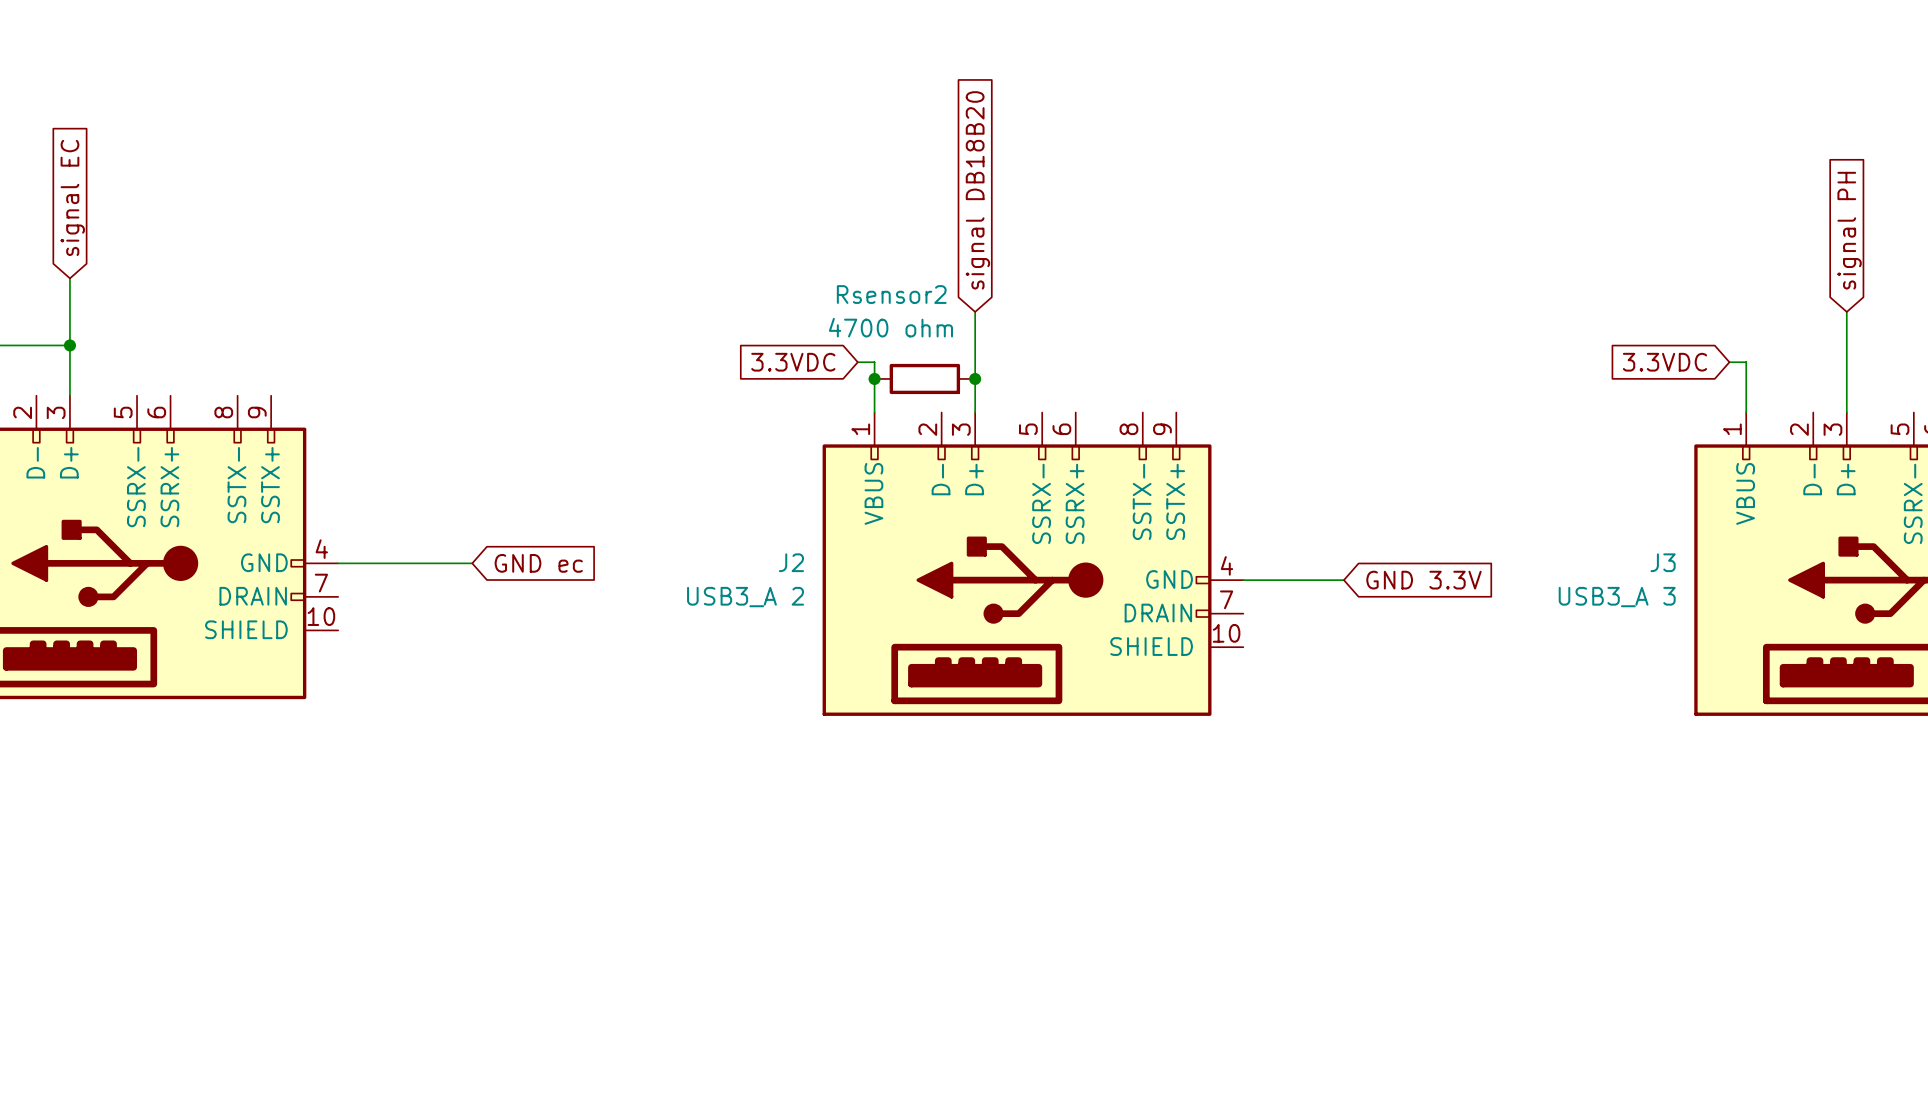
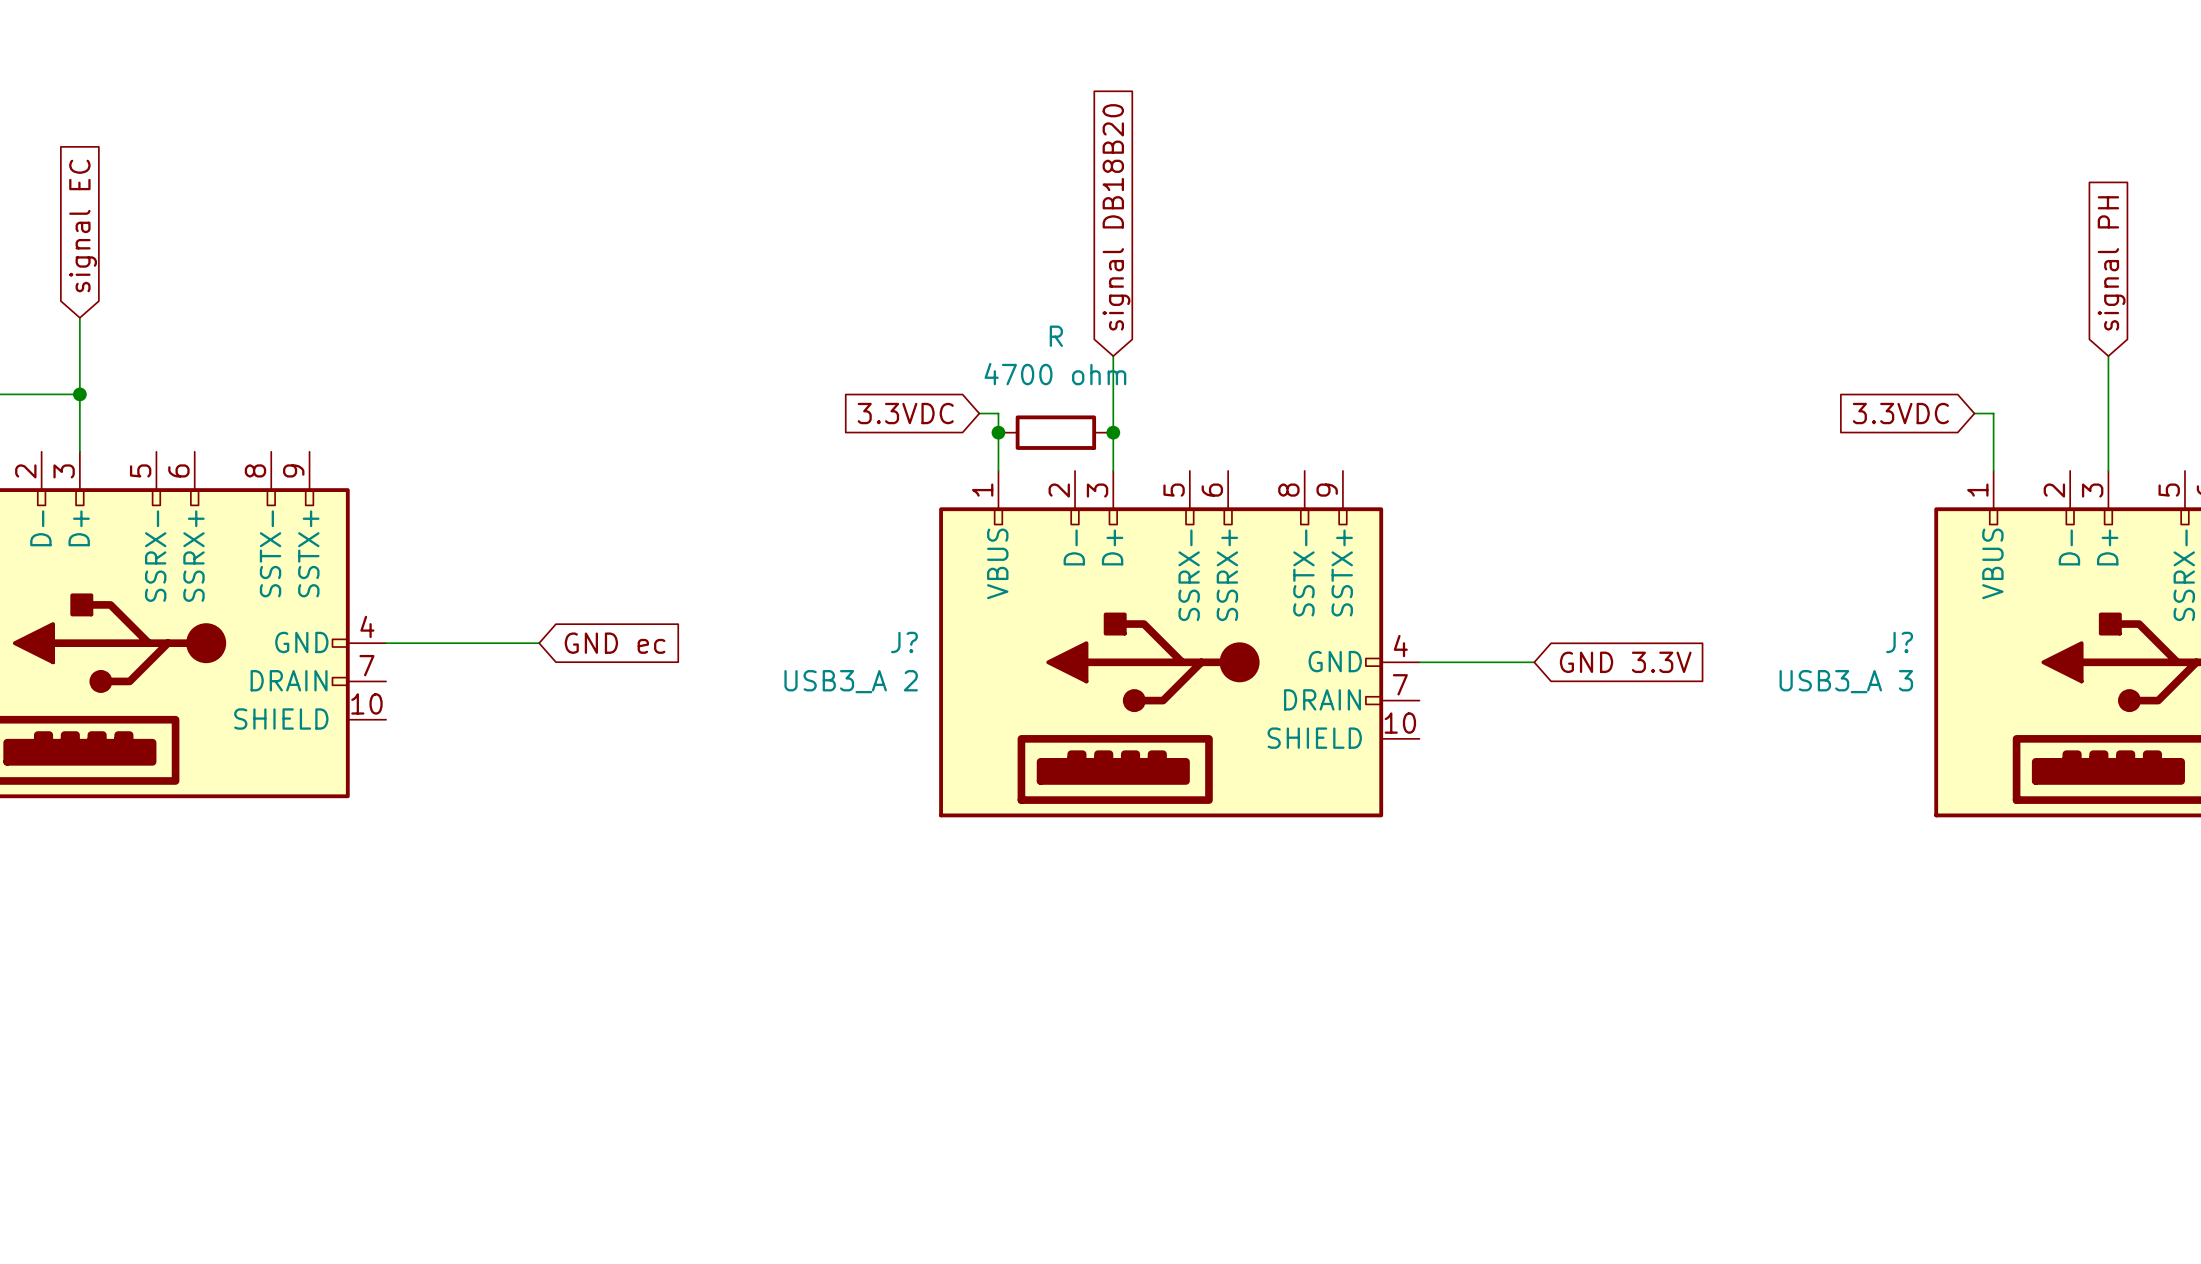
Rsensor2 name: Rsensor2 (891, 294) -> R (1056, 336)
Rsensor2 value position: 4700 ohm (890, 327) -> 4700 ohm (1055, 374)
J2 name: J2 (791, 562) -> J? (904, 642)
J3 name: J3 (1663, 562) -> J? (1899, 642)

